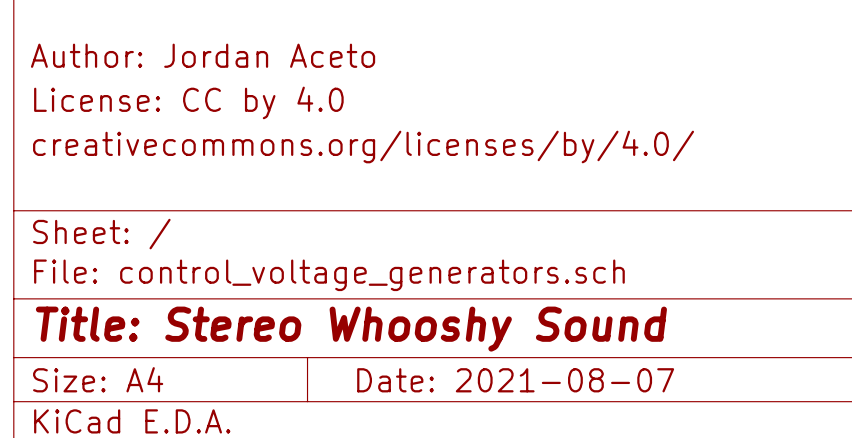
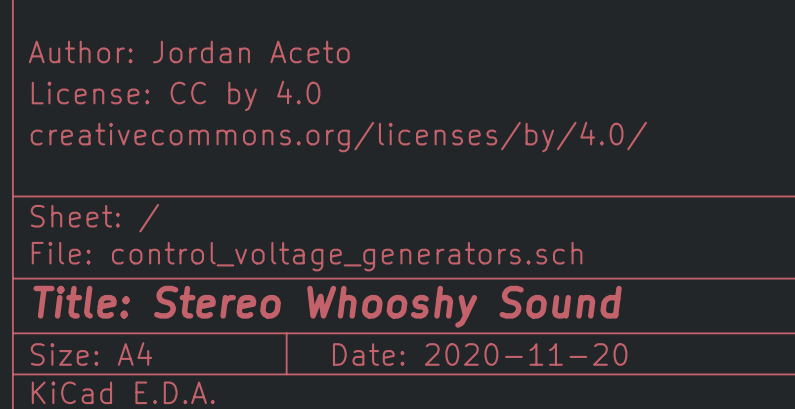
title block: Date: 2021-08-07 (515, 380) -> Date: 2020-11-20 (480, 354)

